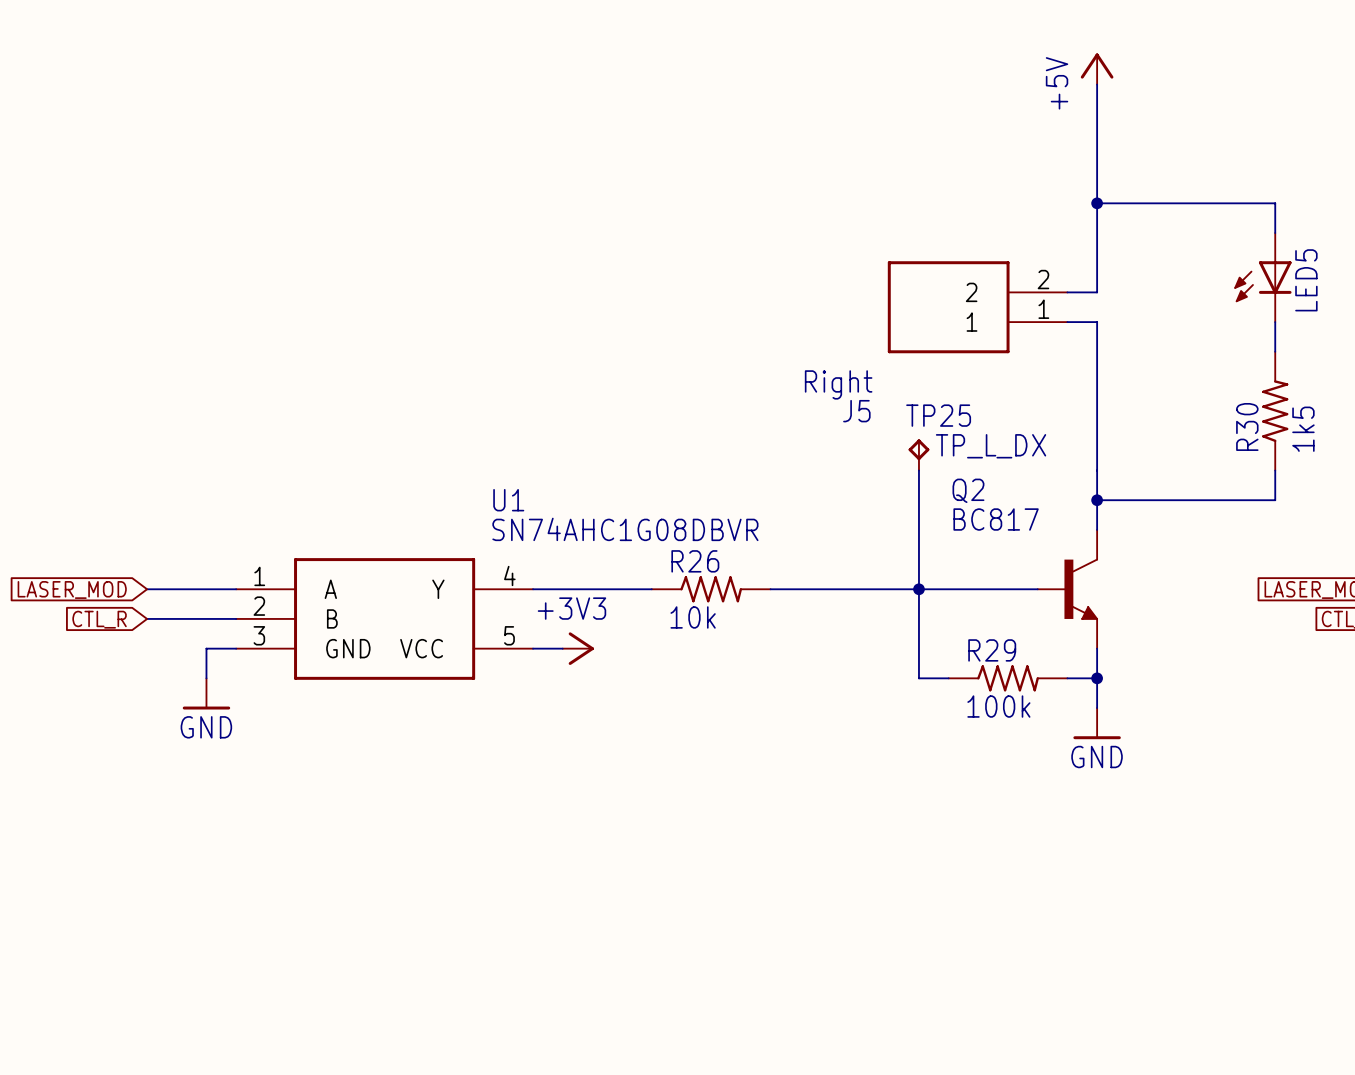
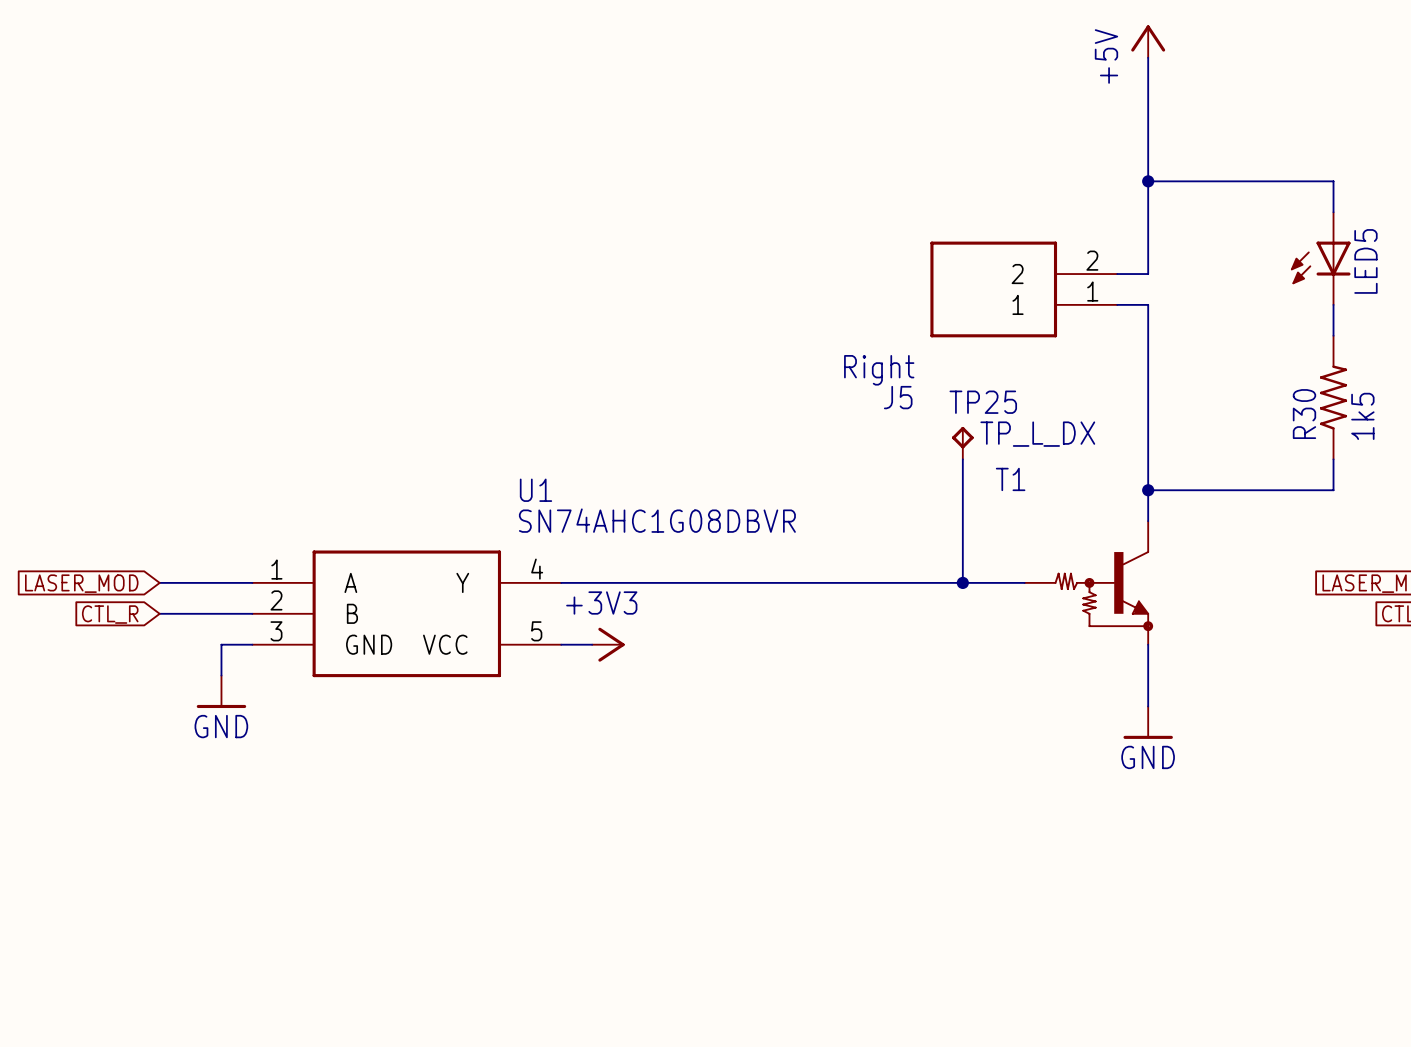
R26: 10k (711, 589) -> none
wire: (918, 589) (918, 678) (948, 678) -> none
T1: none -> (1088, 582)
Q2: BC817 (1067, 589) -> none
R29: 100k (1008, 678) -> none
wire: (1067, 678) (1097, 678) -> none
junction: (1097, 678) -> none

